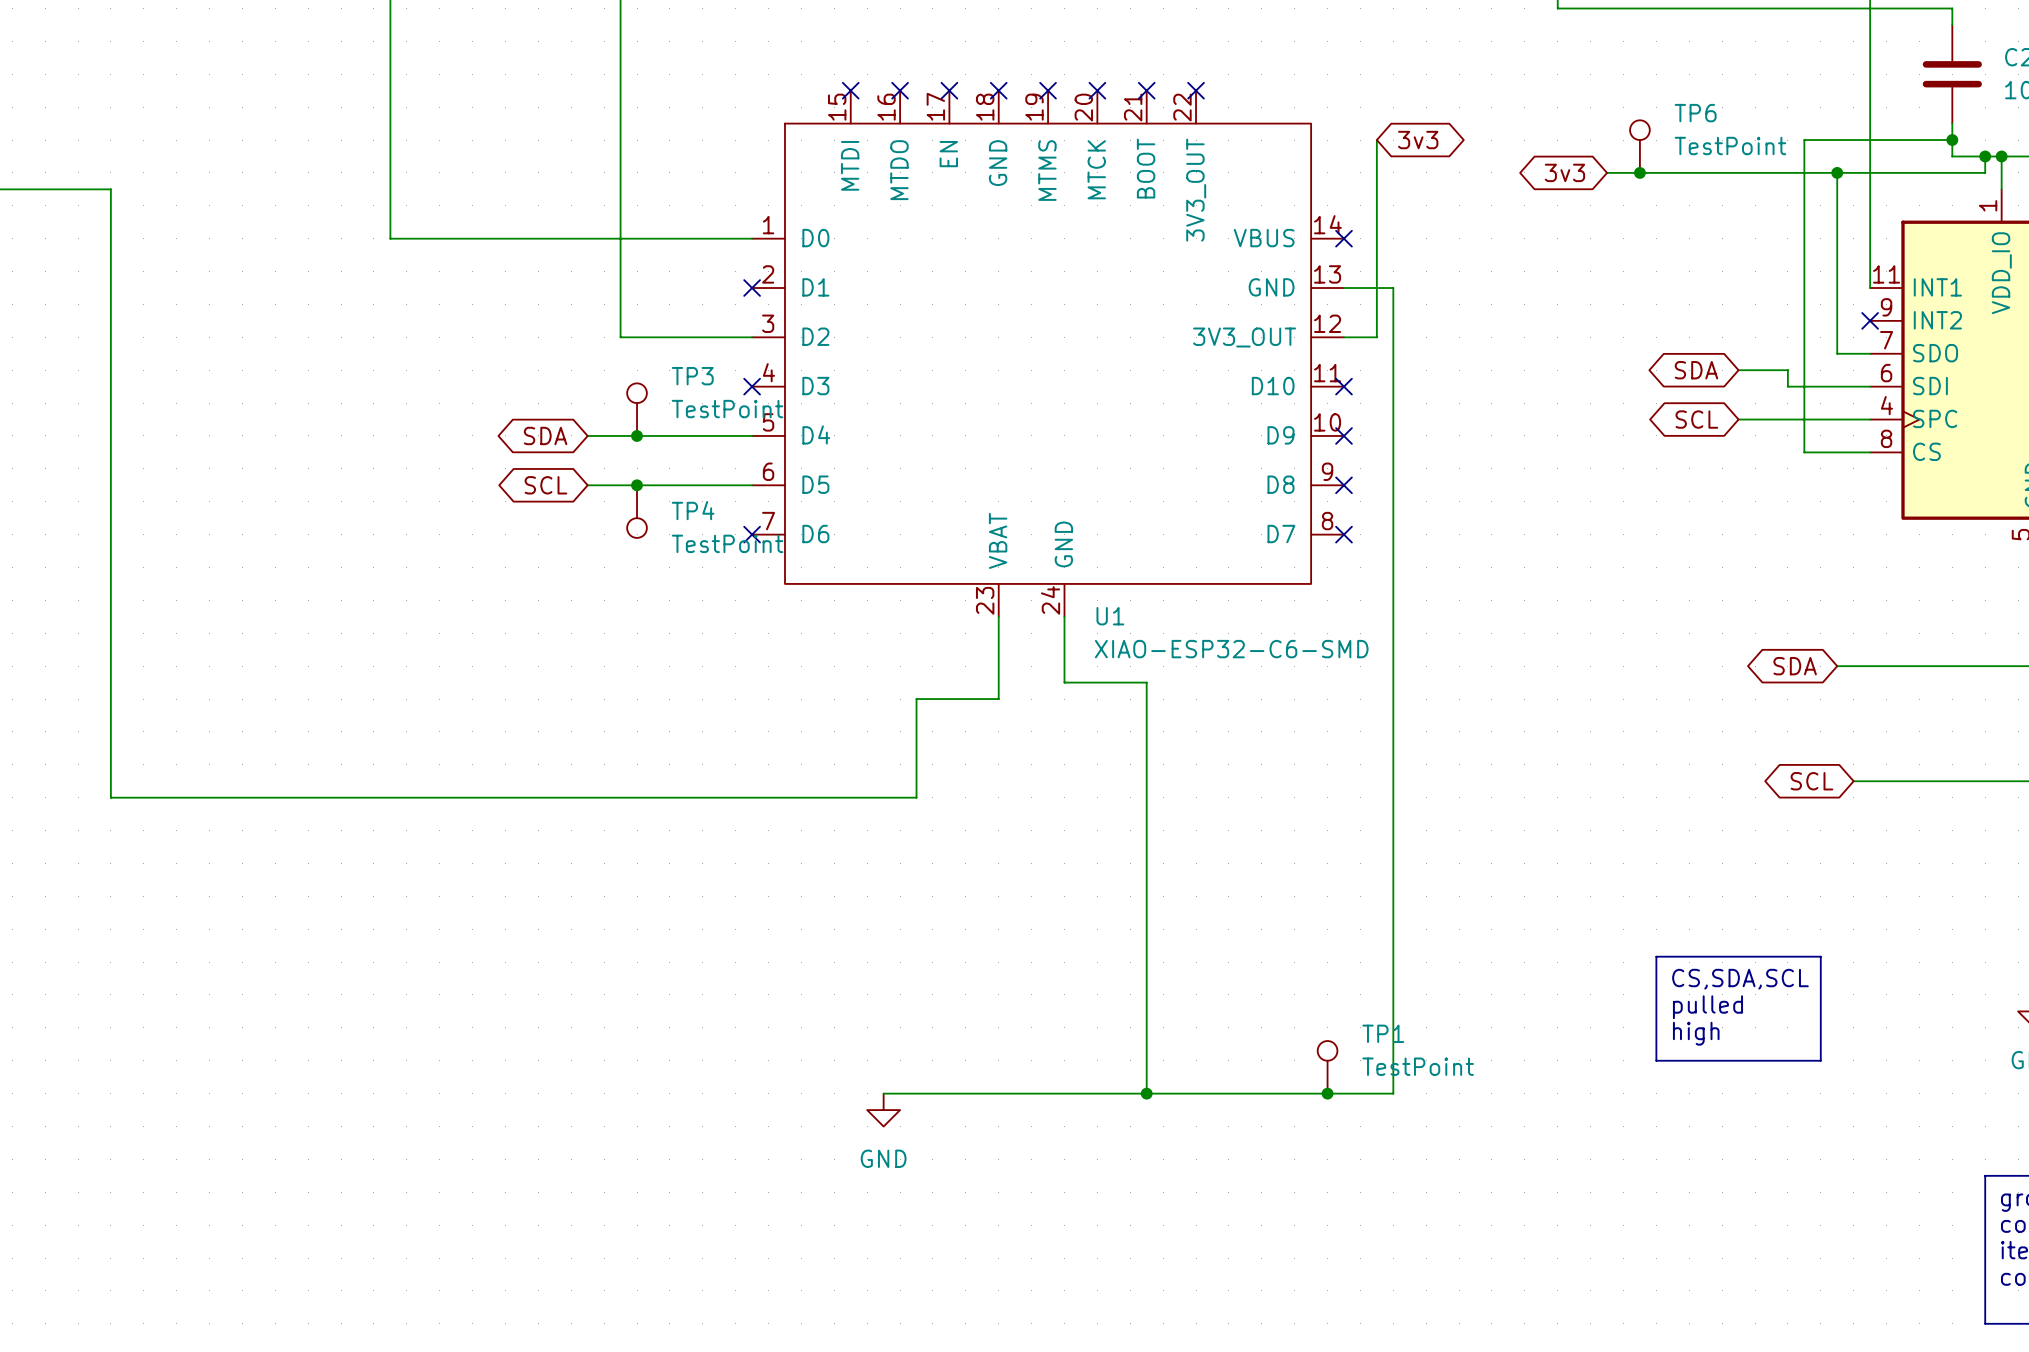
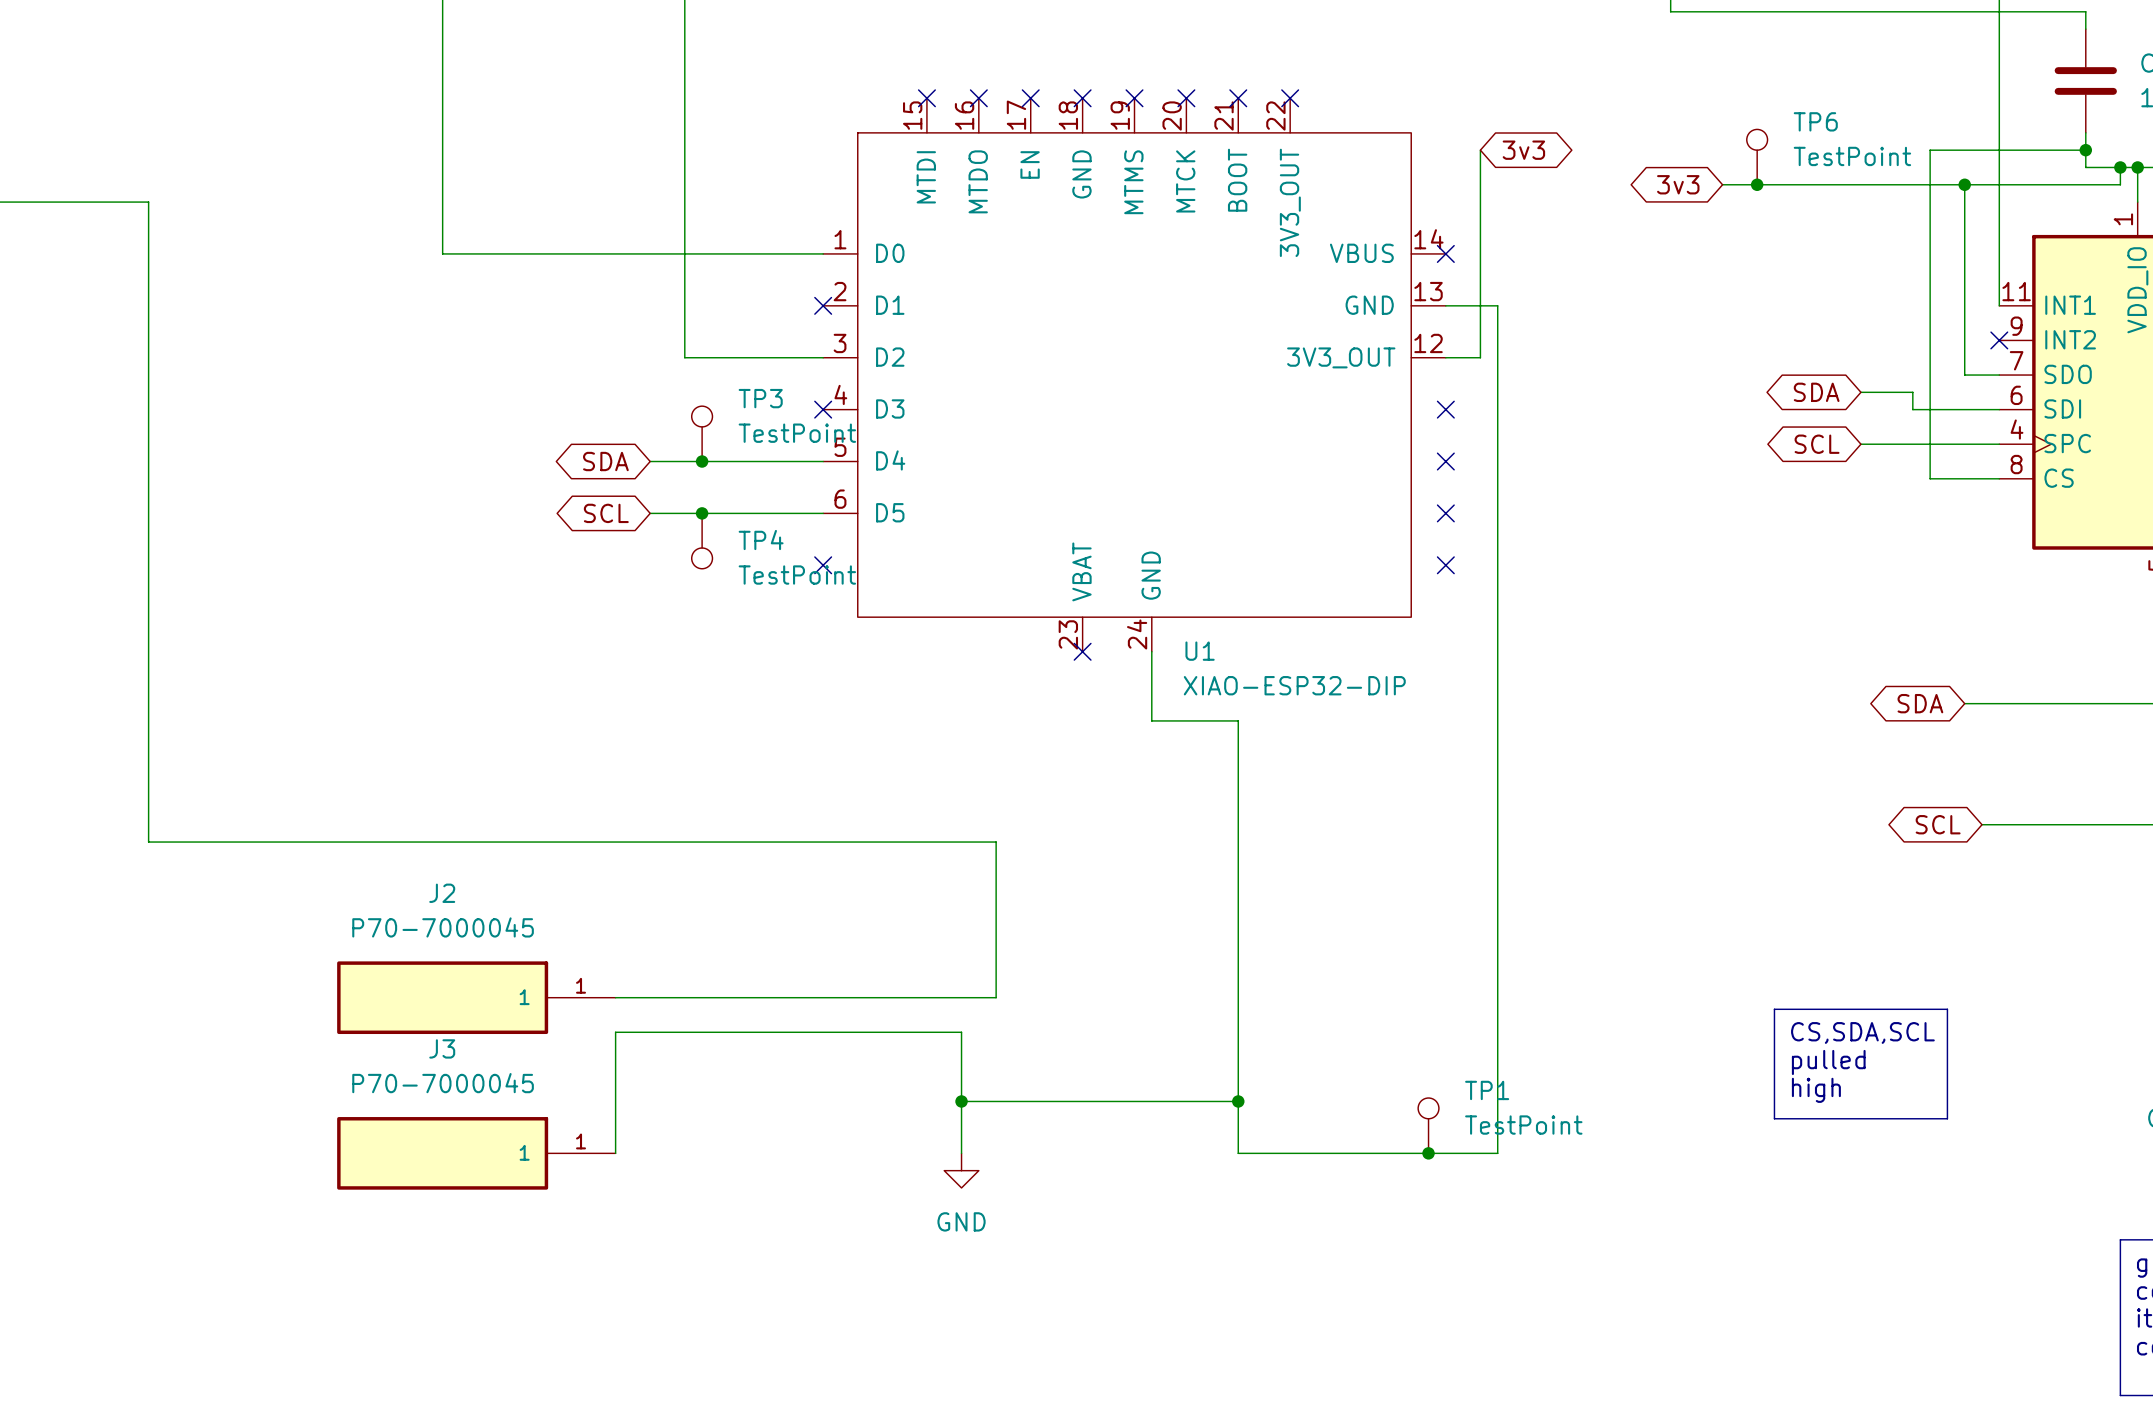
U1 symbol: [752, 90, 1344, 617] -> [823, 98, 1446, 652]
wire: (998, 616) (998, 699) (916, 699) (916, 797) -> (615, 997) (996, 997) (996, 842)
no-connect mark: none -> (1082, 651)
U1 value: XIAO-ESP32-C6-SMD (1231, 649) -> XIAO-ESP32-DIP (1294, 685)
J2: none -> P70-7000045 (476, 997)
wire: none -> (961, 1101) (1238, 1101)
junction: none -> (961, 1101)
J3: none -> P70-7000045 (476, 1153)
wire: (883, 1093) (1146, 1093) -> (961, 1153) (961, 1032) (615, 1032) (615, 1153)
junction position: (1146, 1093) -> (1238, 1101)

